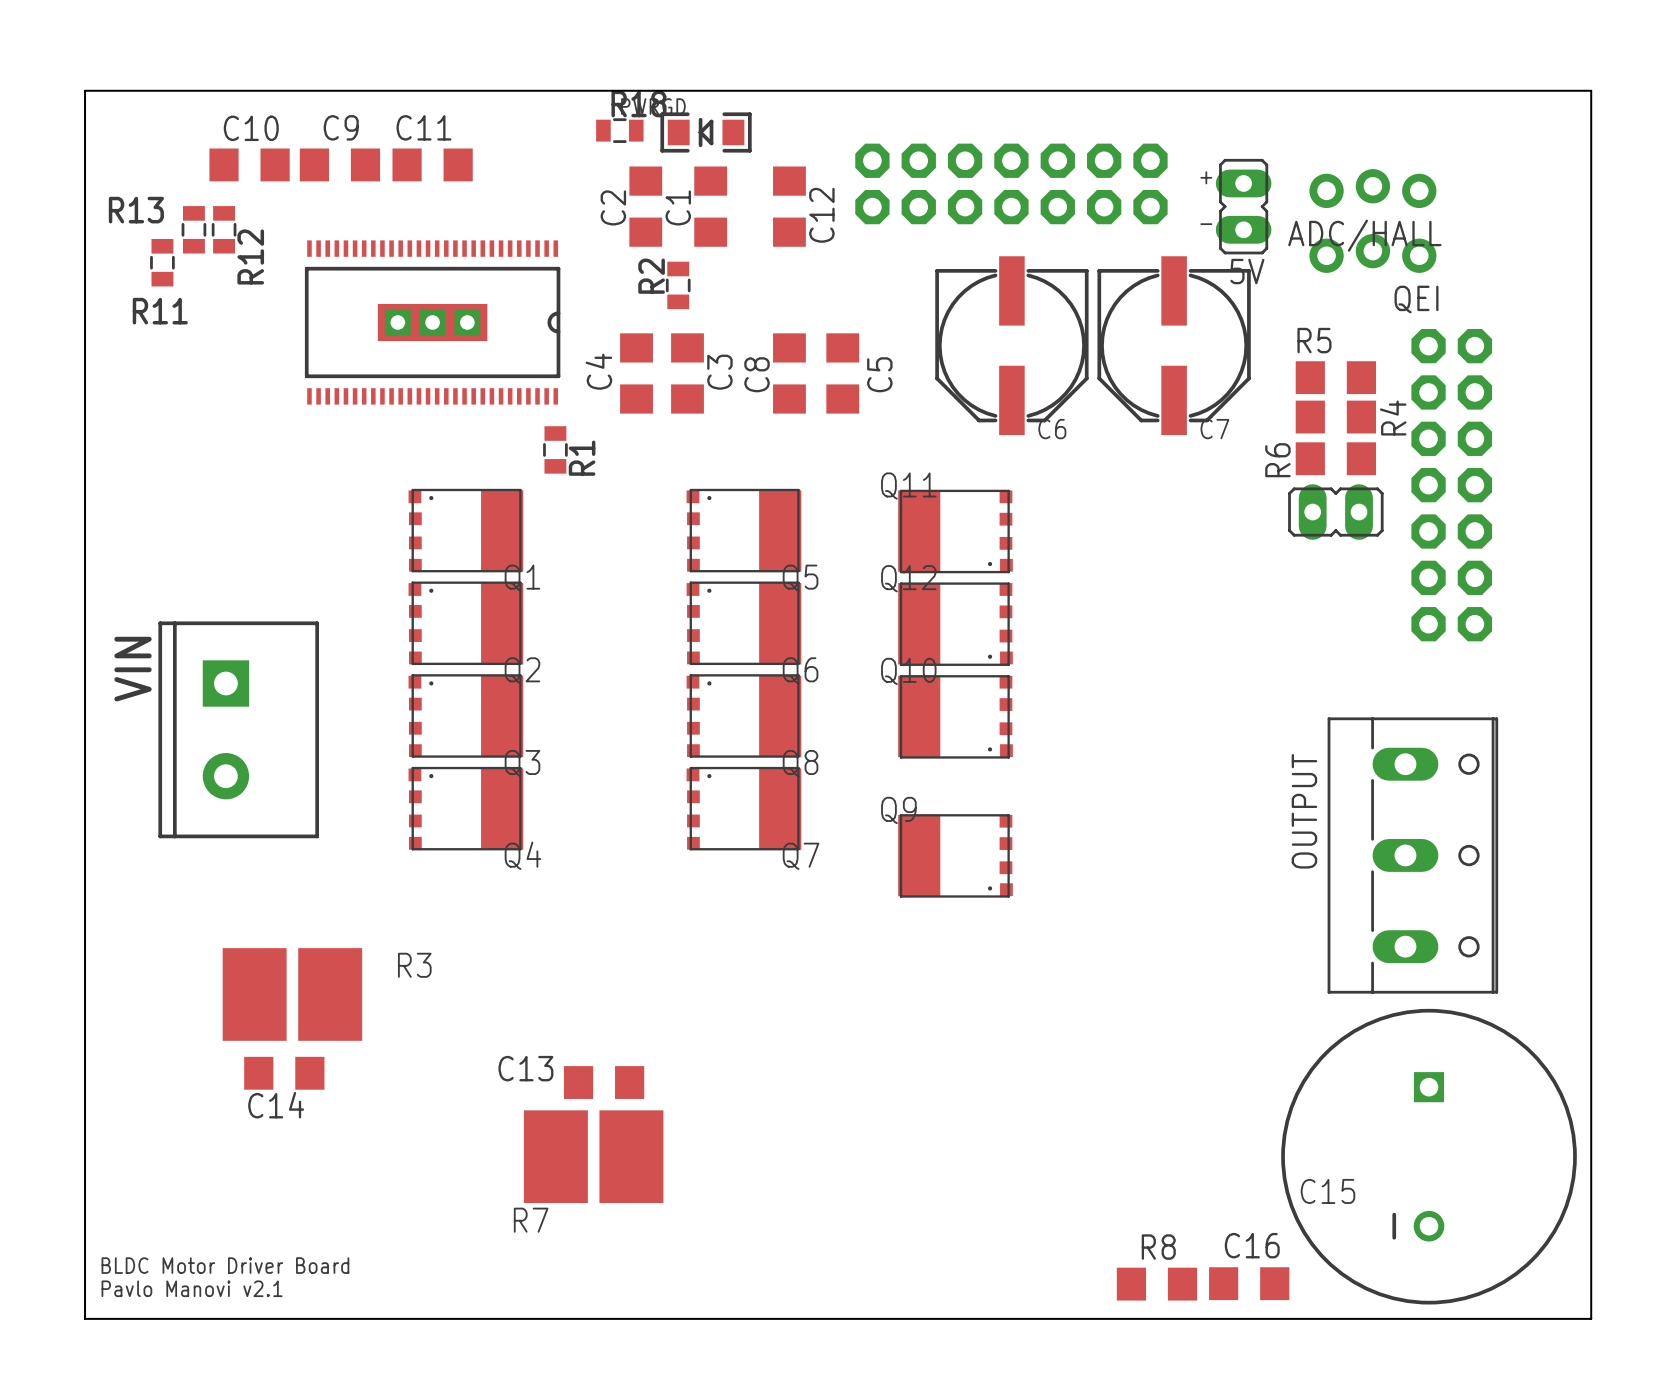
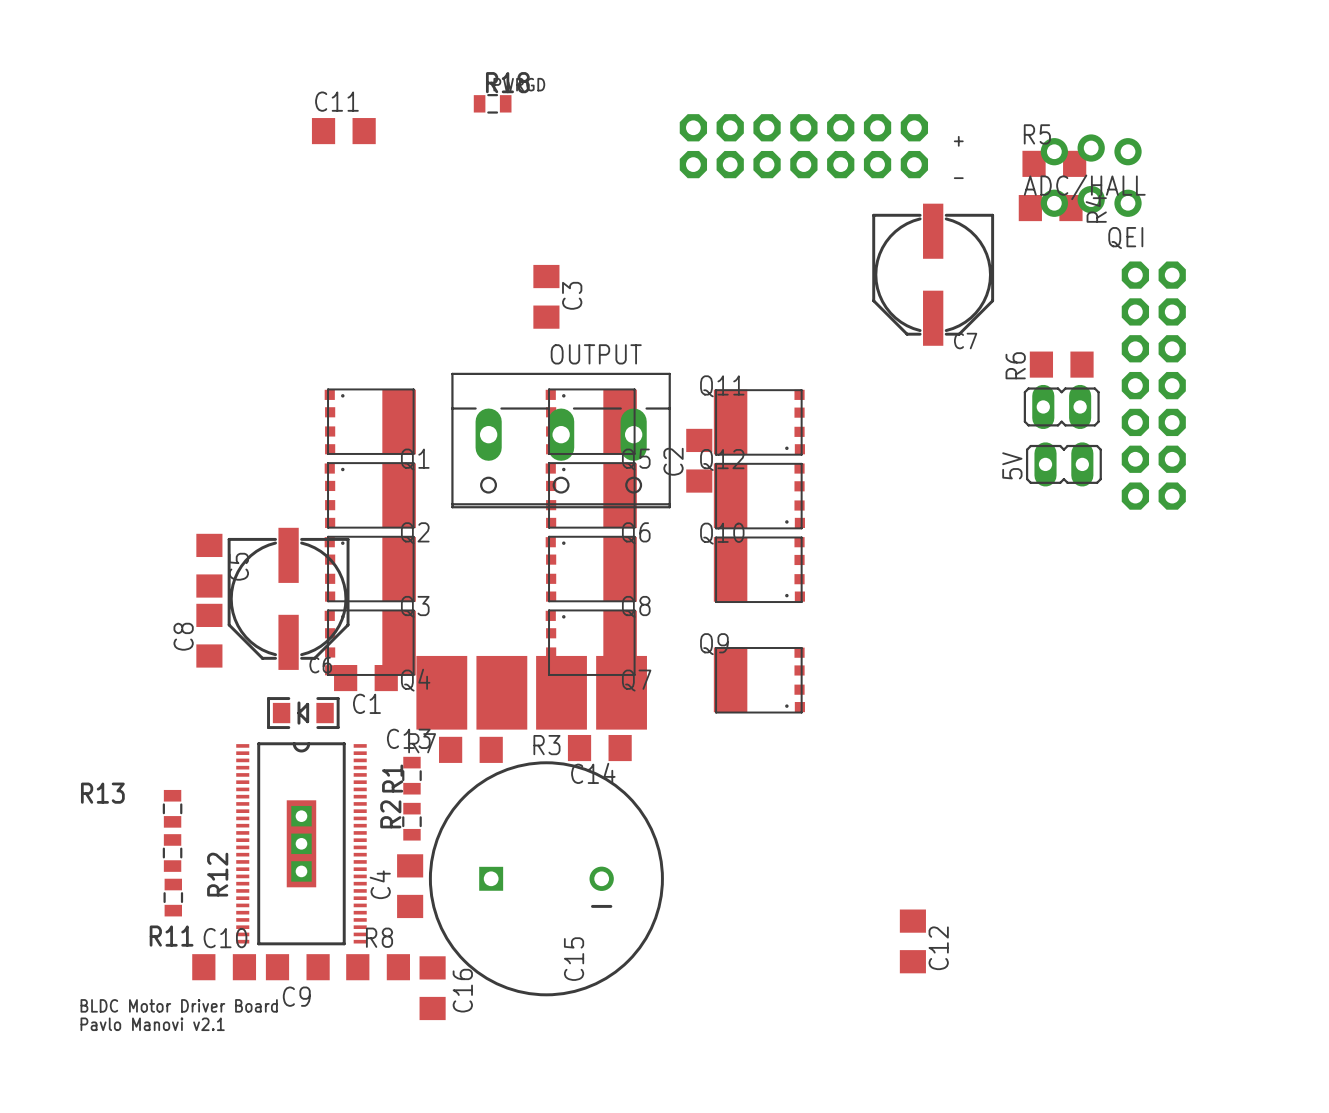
board edge: (85, 90) (1591, 90) (1591, 1318) (85, 1318) (85, 90) -> none
C9 name position: C9 (341, 127) -> C9 (296, 996)
part: (706, 132) -> none
C10 position: (249, 164) -> (224, 967)
C9 position: (339, 164) -> (297, 967)
C2 position: (645, 206) -> (699, 460)
C1 rotation: 0° (710, 206) -> 90° clockwise (365, 678)
C1 position: (710, 206) -> (365, 678)
C12 position: (789, 206) -> (912, 941)
5V rotation: 0° (1243, 206) -> 90° clockwise (1063, 464)
5V position: (1243, 206) -> (1063, 464)
C1 name position: C1 (678, 207) -> C1 (366, 703)
R12 position: (193, 229) -> (172, 853)
R13 position: (224, 229) -> (172, 808)
R11 position: (162, 262) -> (173, 897)
R2 position: (678, 285) -> (411, 821)
part: (432, 322) -> none
C6 position: (1011, 345) -> (288, 598)
C4 position: (636, 373) -> (410, 886)
C8 position: (789, 373) -> (209, 635)
C5 position: (842, 373) -> (209, 565)
R5 position: (1335, 377) -> (1054, 163)
R4 position: (1335, 417) -> (1050, 208)
R1 position: (555, 449) -> (411, 775)
R1 name position: R1 (582, 458) -> R1 (392, 778)
OUTPUT: none -> (561, 440)
VIN: (238, 729) -> none
OUTPUT: (1412, 855) -> none
part: none -> (303, 713)
R3 name position: R3 (414, 965) -> R3 (546, 745)
R3 position: (292, 994) -> (591, 692)
part: none -> (301, 843)
C14 position: (284, 1073) -> (599, 748)
C13 position: (604, 1082) -> (470, 749)
R7 position: (593, 1156) -> (471, 692)
C15 rotation: 0° (1429, 1156) -> 90° counterclockwise (546, 878)
C15 position: (1429, 1156) -> (546, 878)
C16 rotation: 0° (1249, 1283) -> 90° clockwise (432, 988)
C16 position: (1249, 1283) -> (432, 988)
R8 position: (1156, 1284) -> (378, 967)

